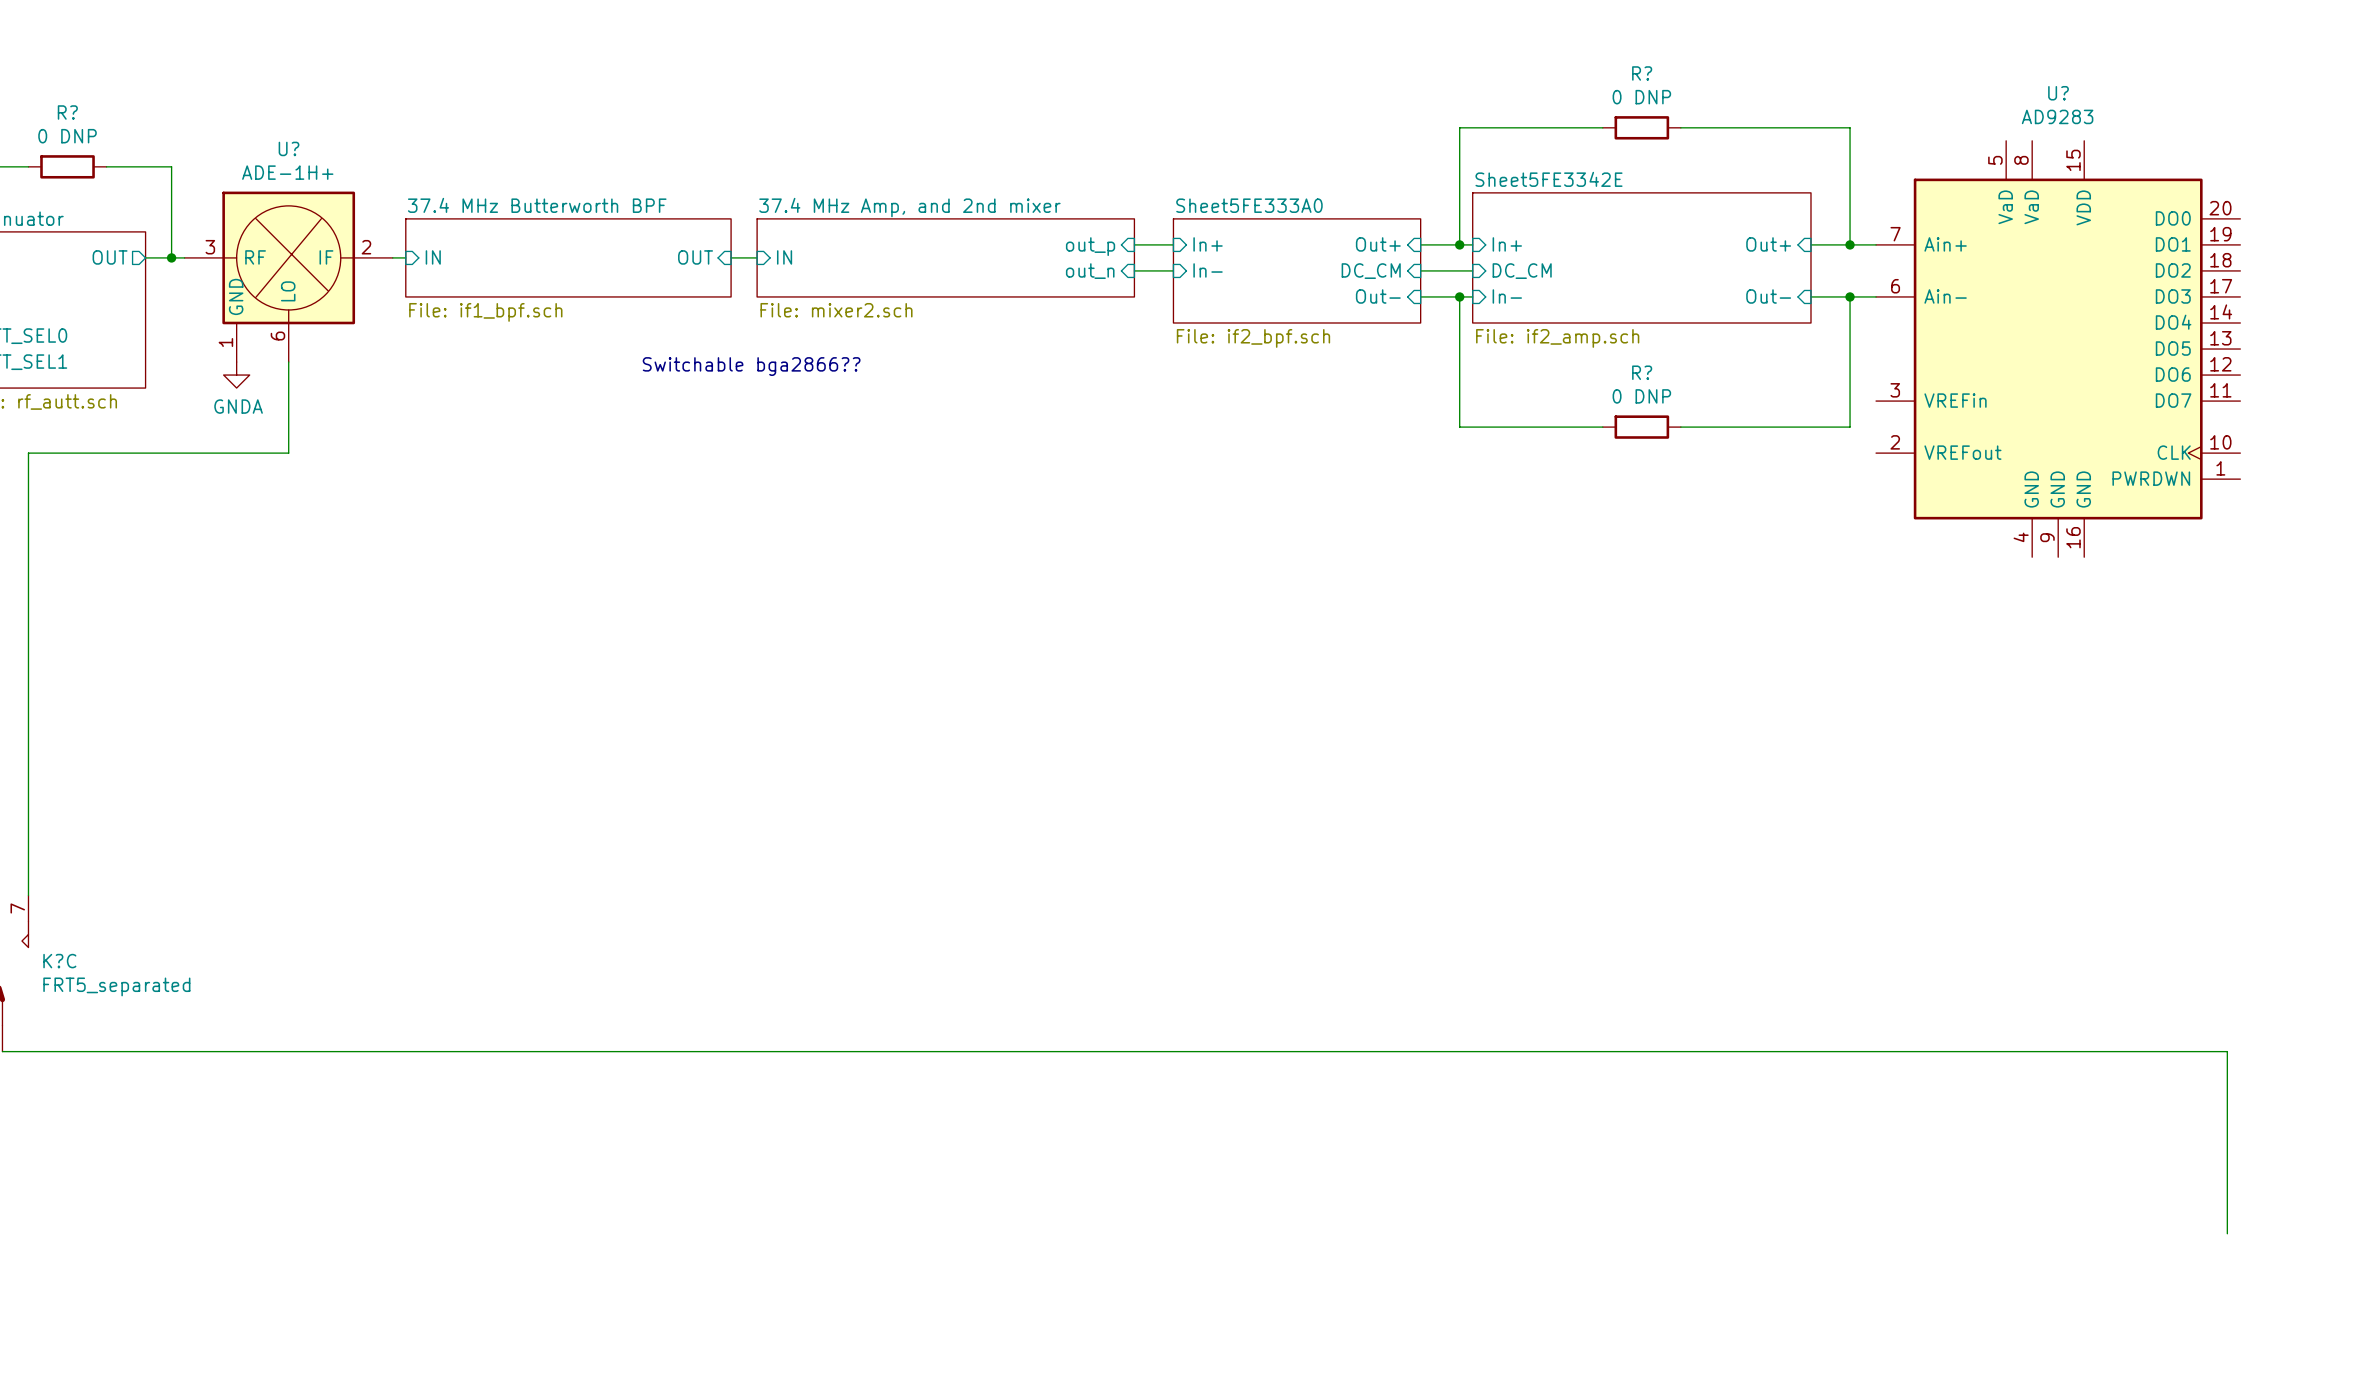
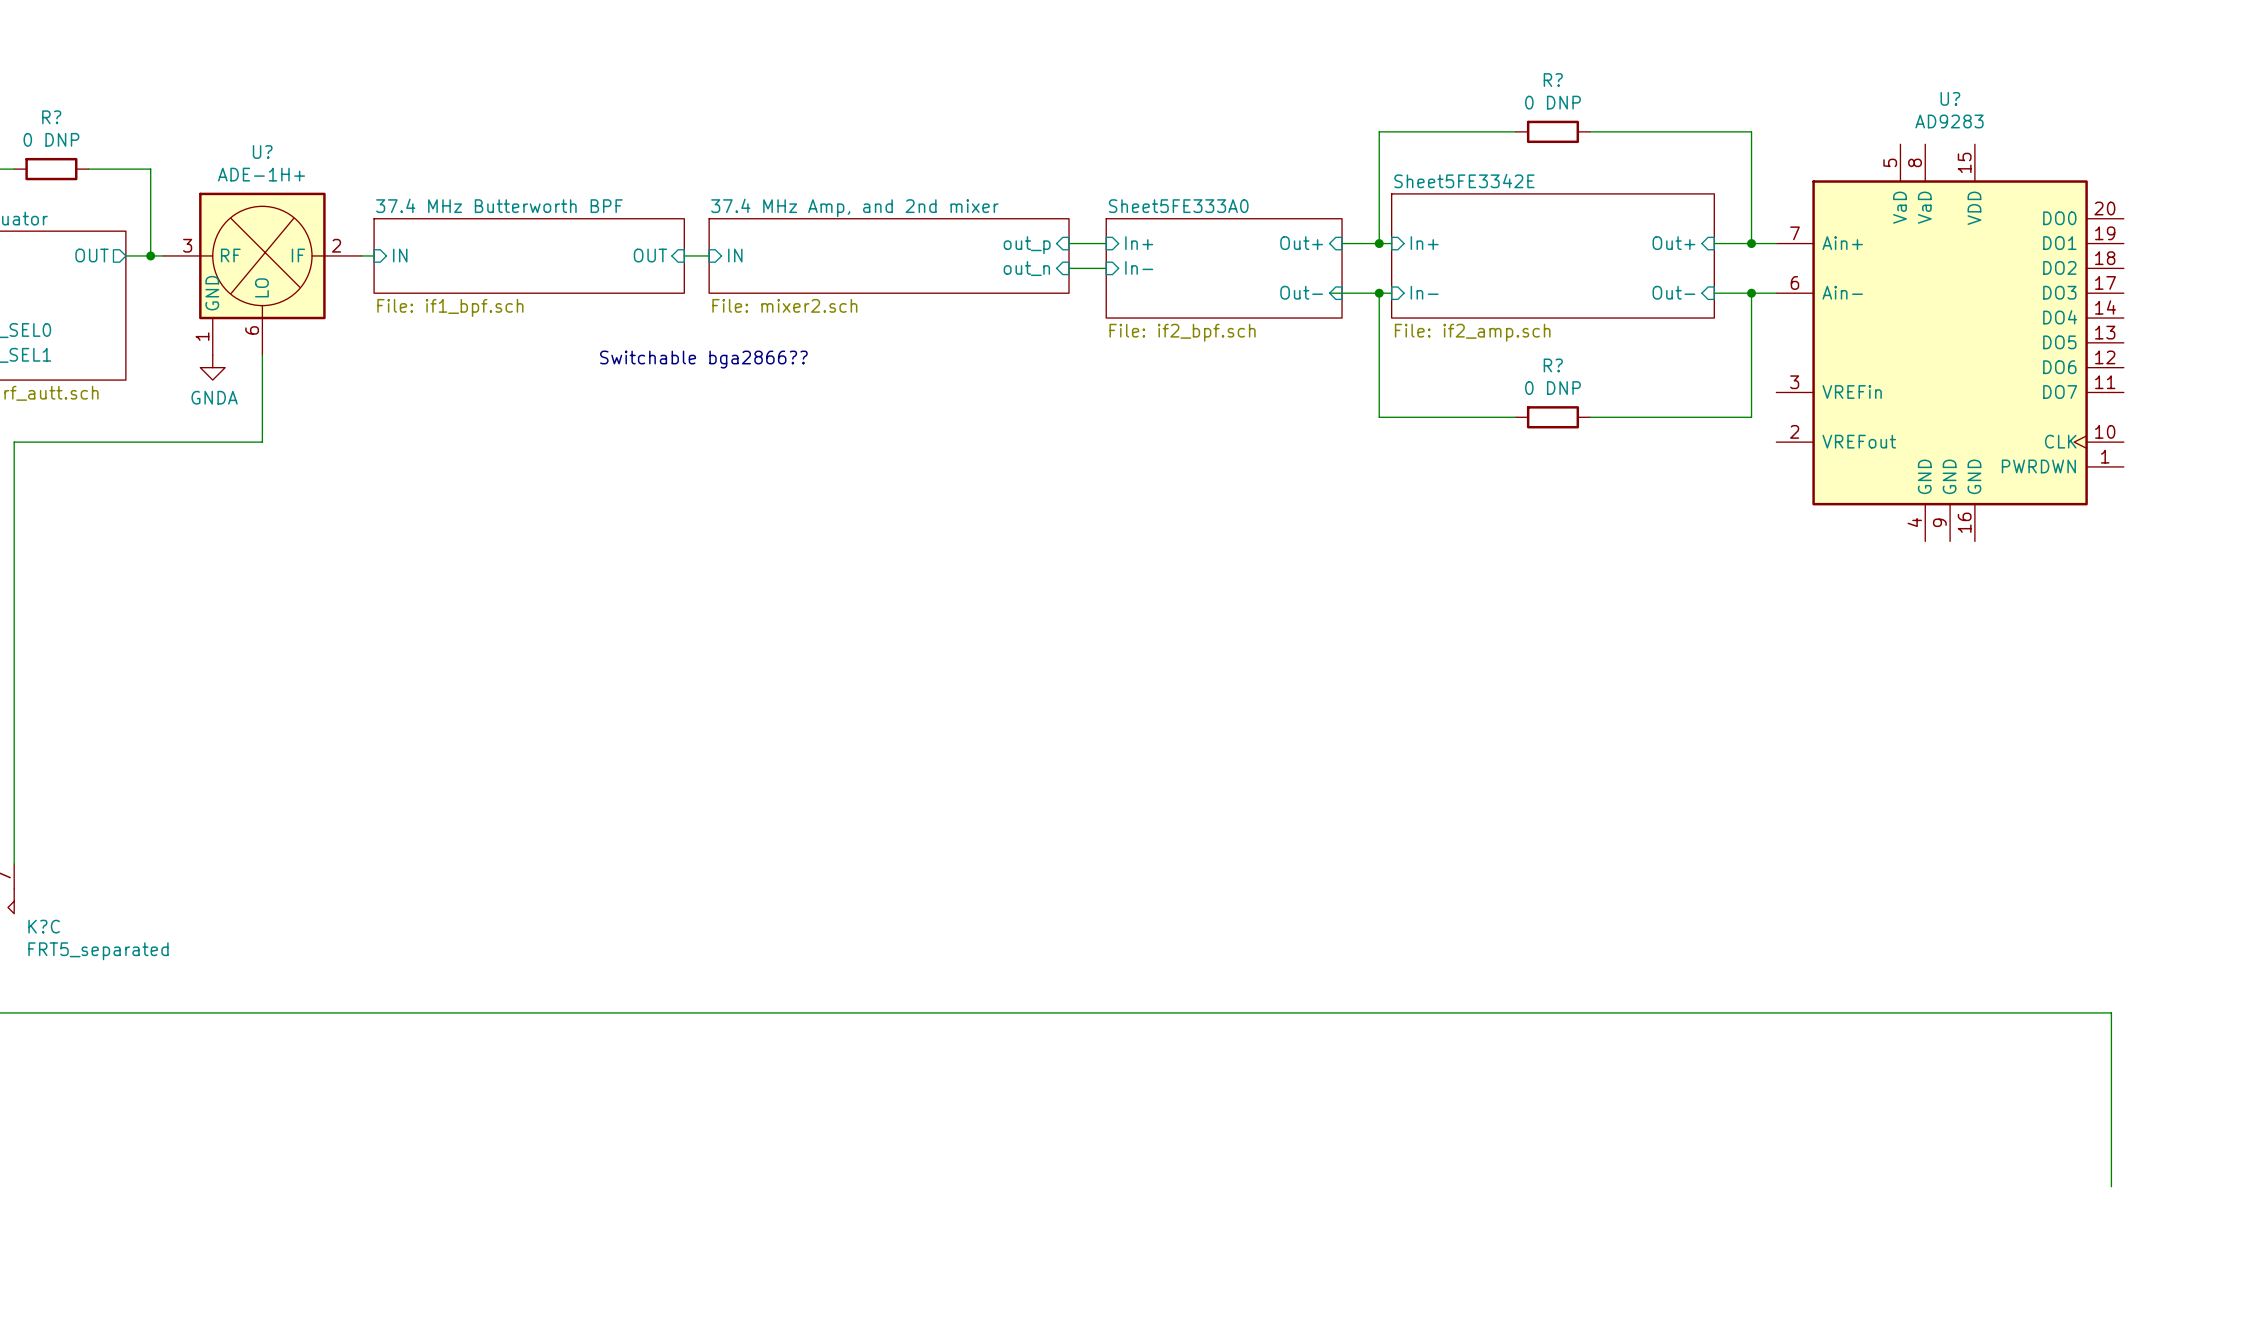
wire: (1420, 270) (1472, 270) -> none
sheet pin: DC_CM (1371, 271) -> none
sheet pin: DC_CM (1522, 271) -> none
wire: none -> (1329, 293) (1342, 293)

